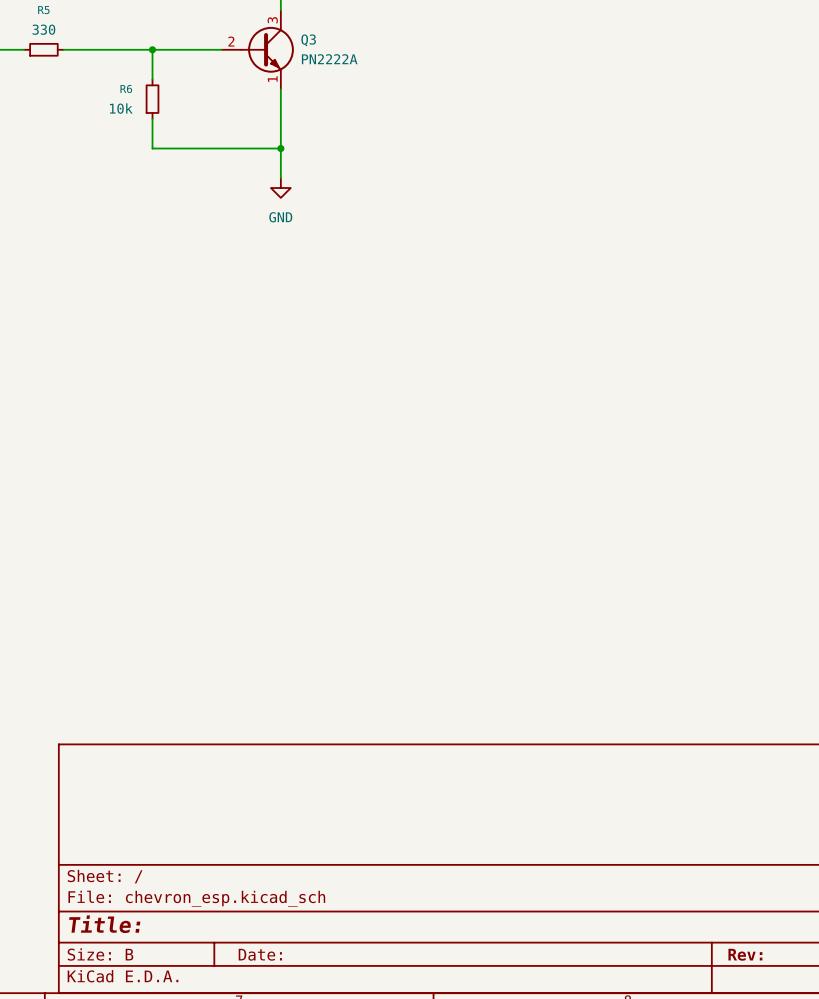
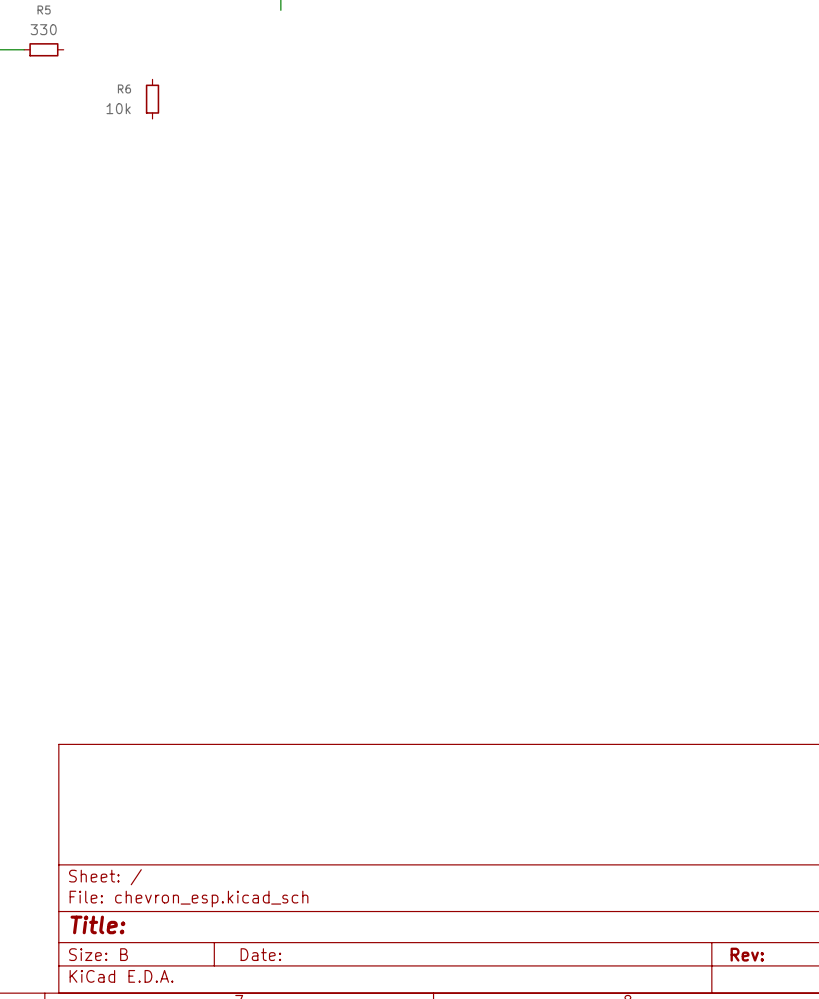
wire: (63, 49) (221, 49) -> none
wire: (152, 49) (152, 79) -> none
junction: (152, 49) -> none
Q3: PN2222A (257, 49) -> none
wire: (280, 89) (280, 178) -> none
wire: (152, 118) (152, 148) (280, 148) -> none
junction: (280, 148) -> none
power symbol: GND (280, 188) -> none

